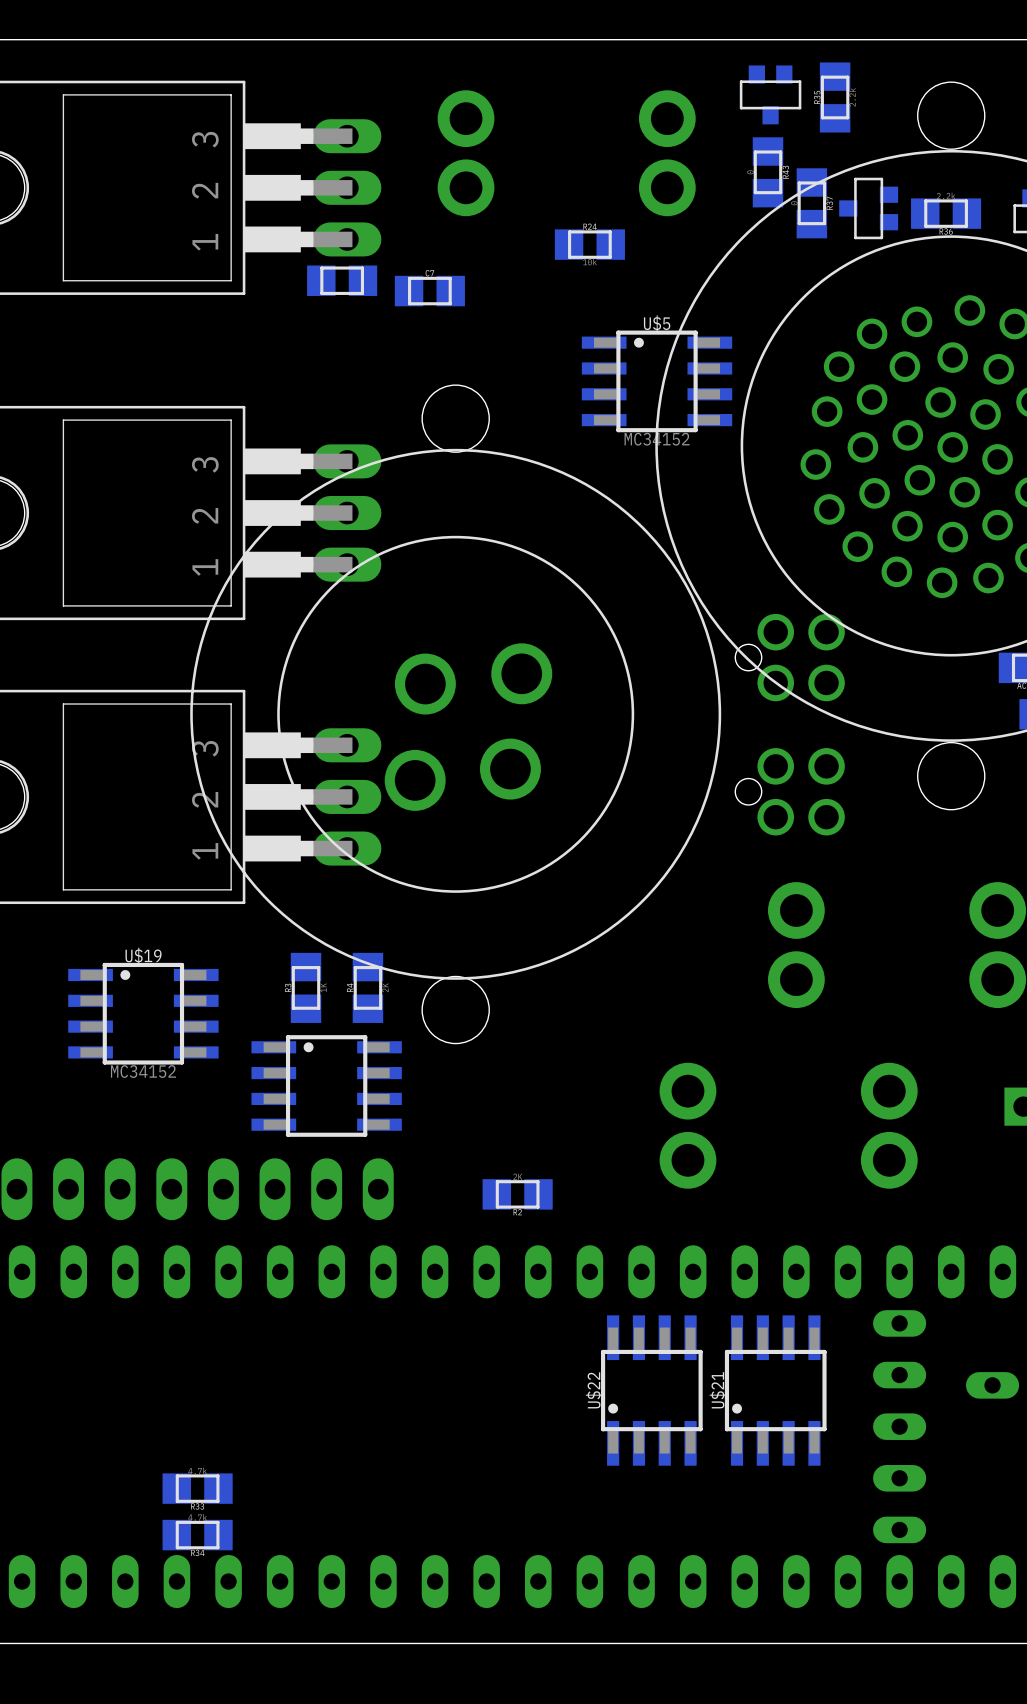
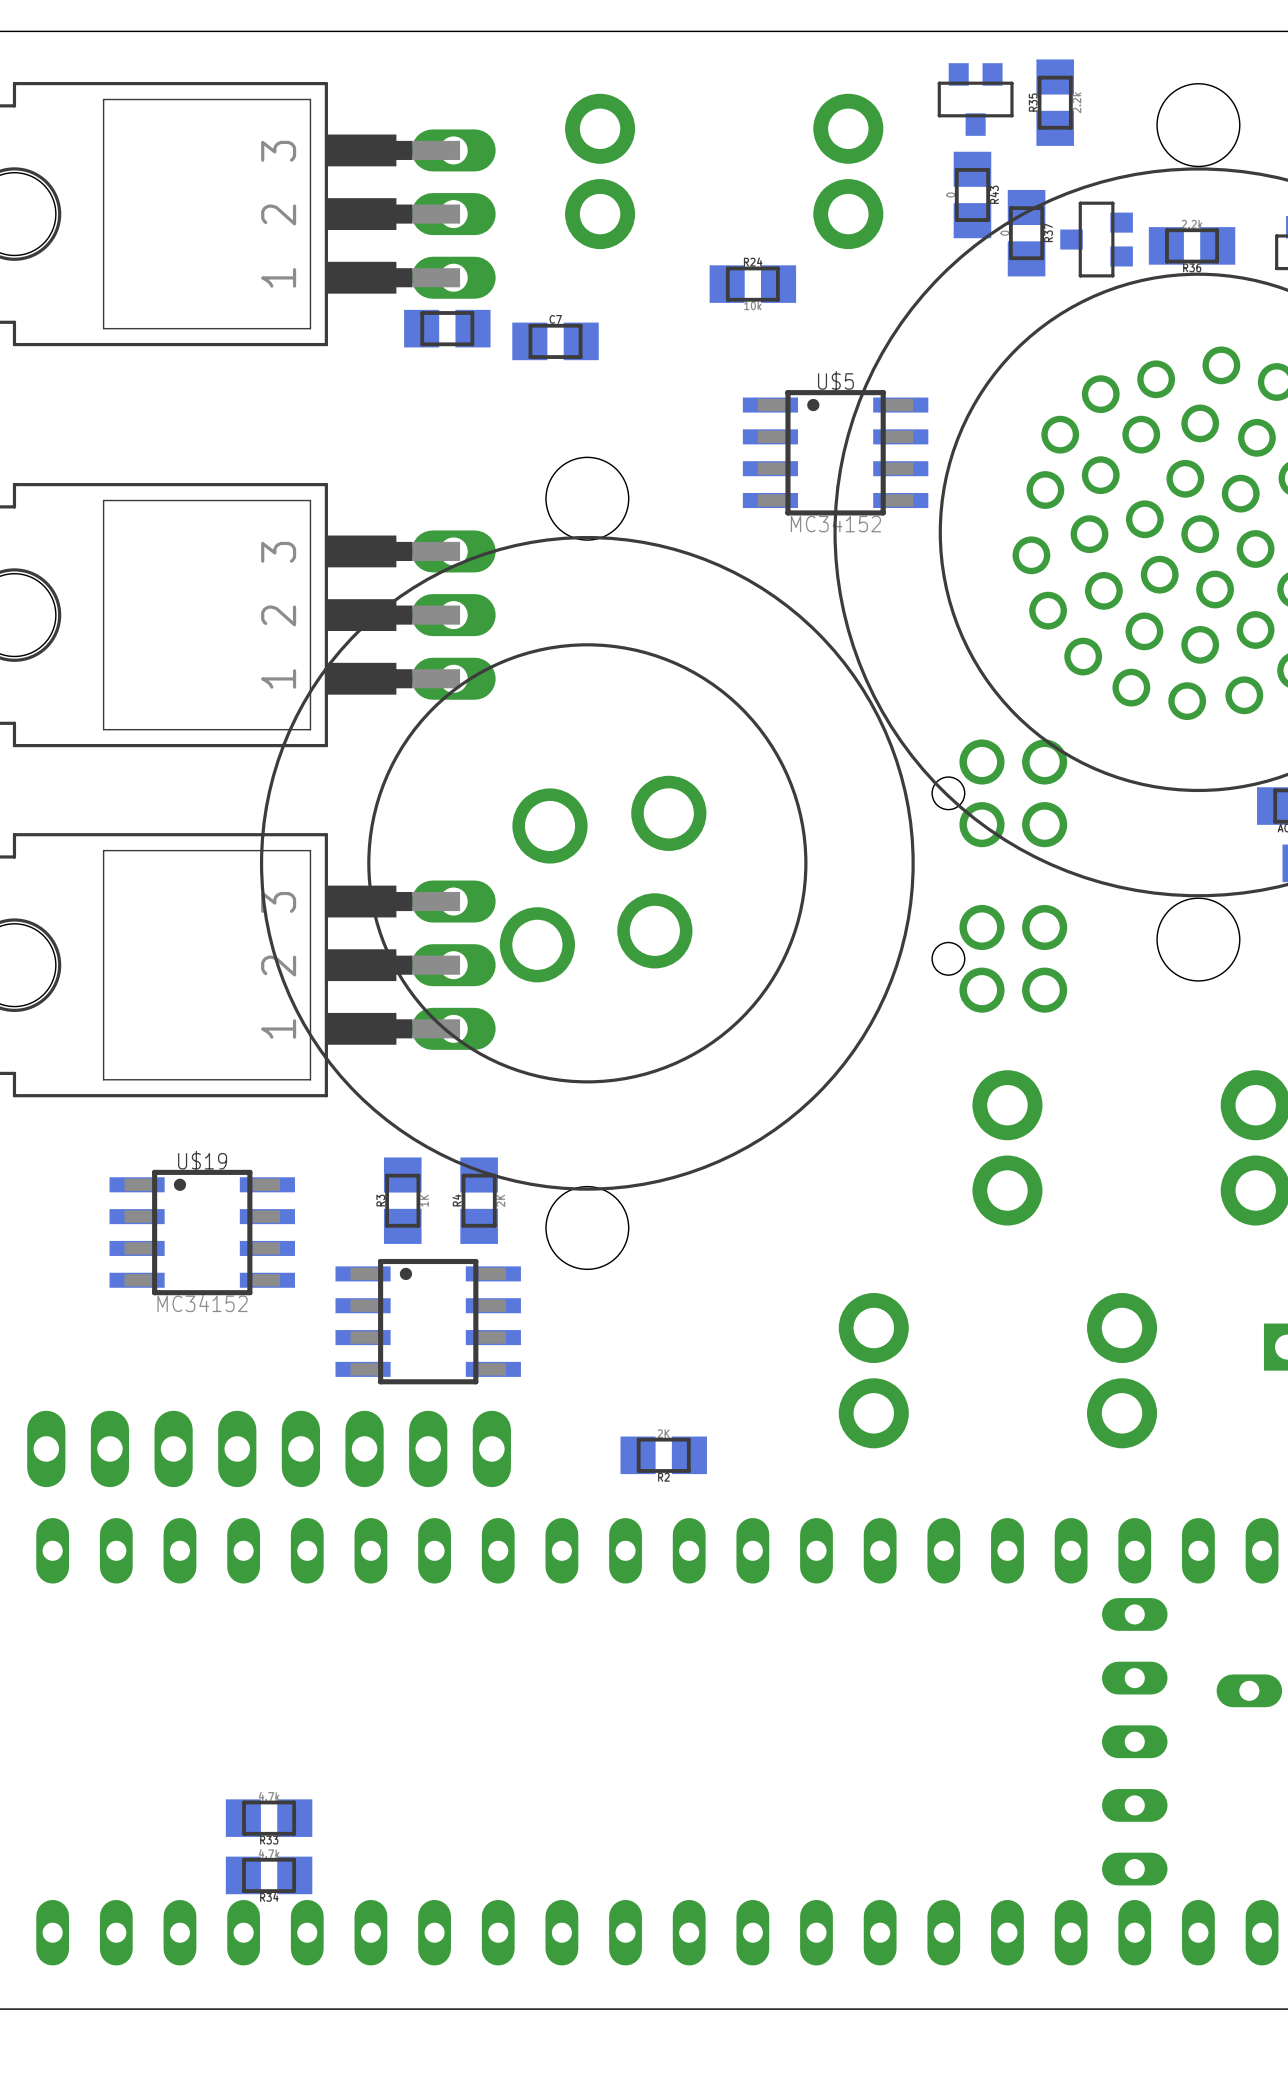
U$22: (651, 1390) -> none
U$21: (775, 1390) -> none

